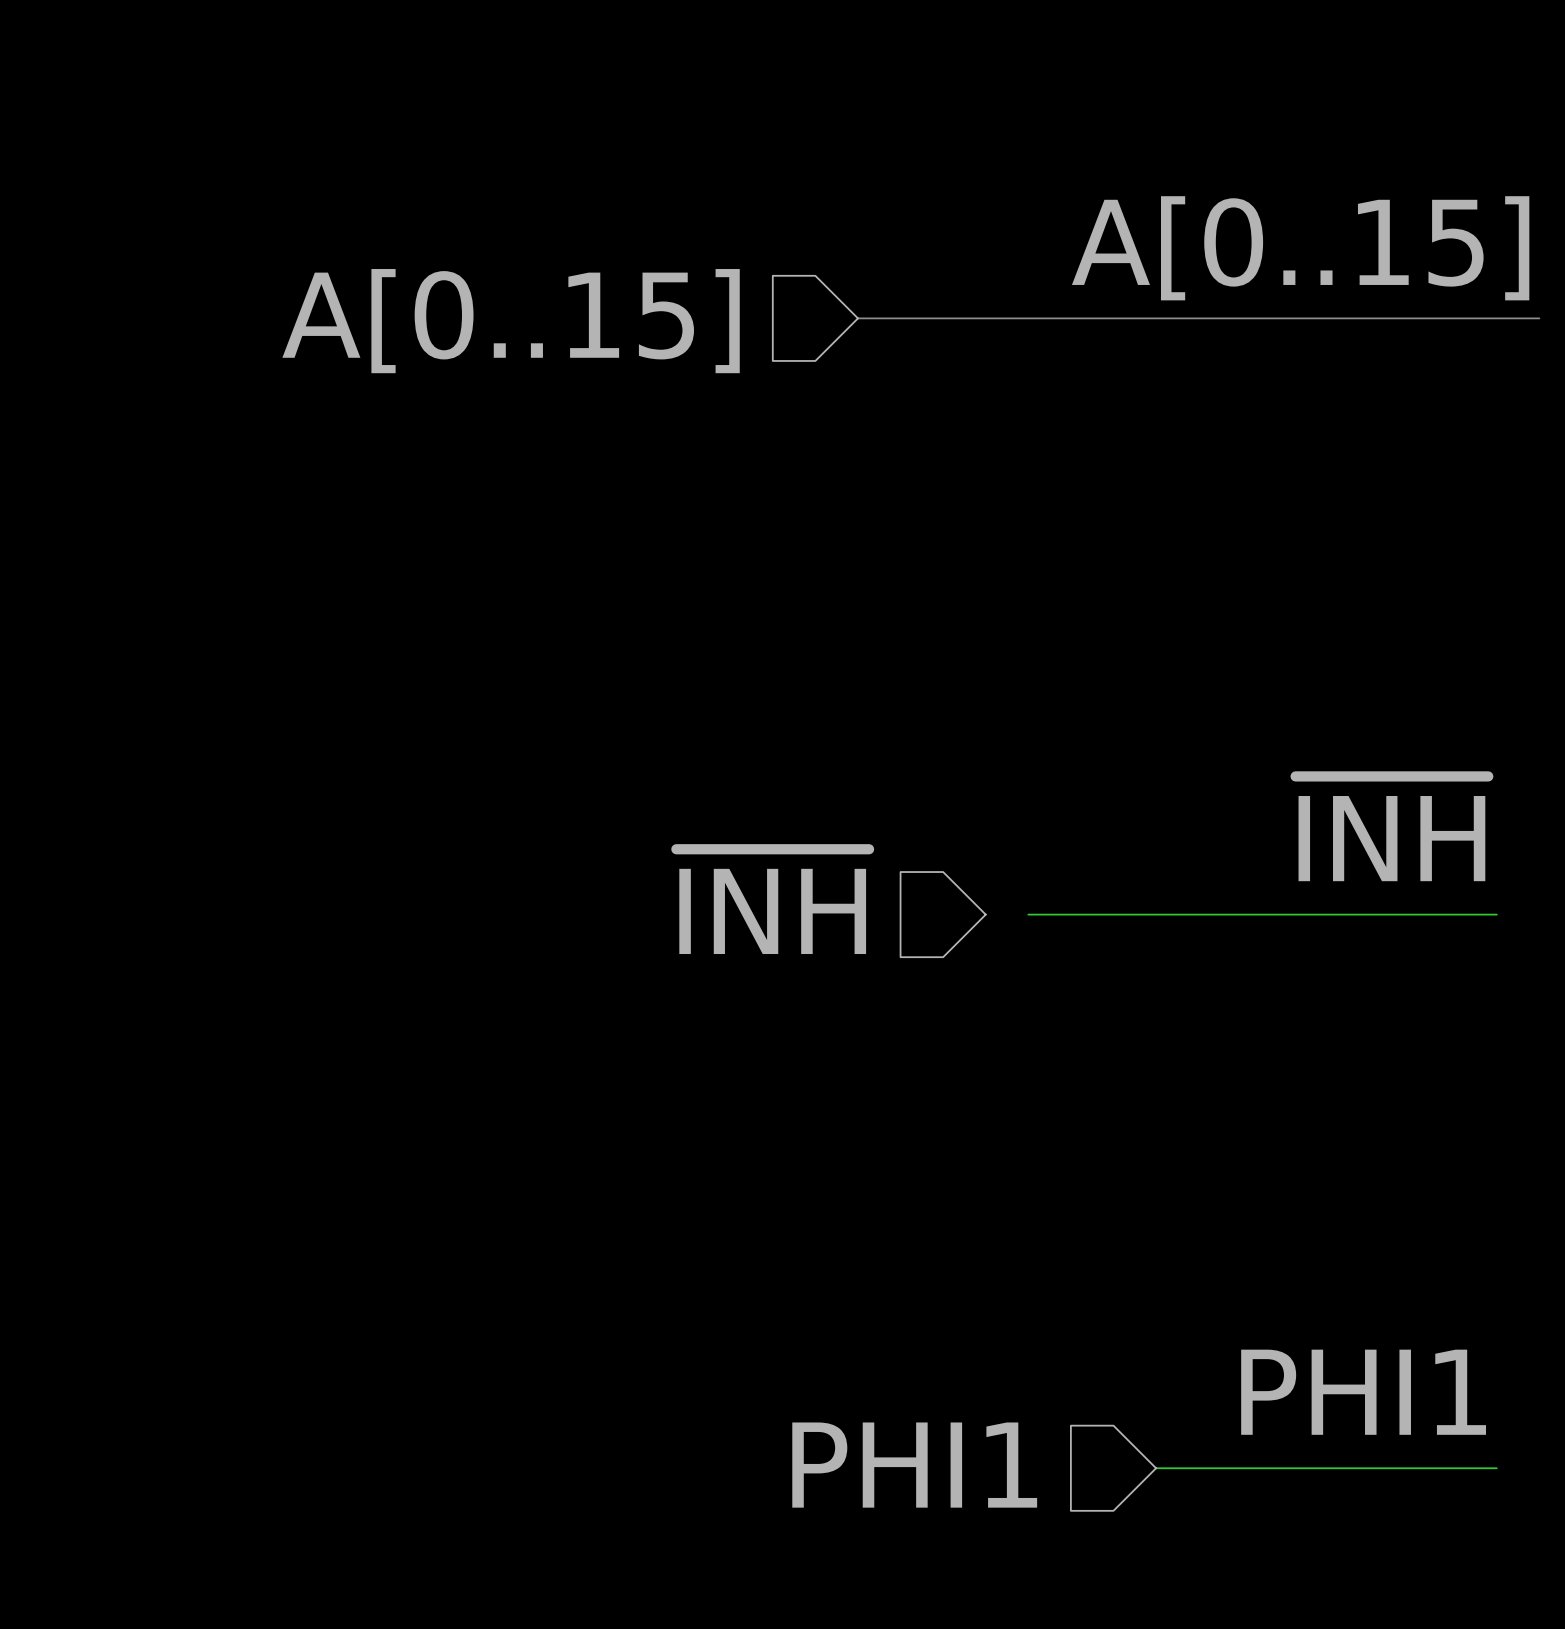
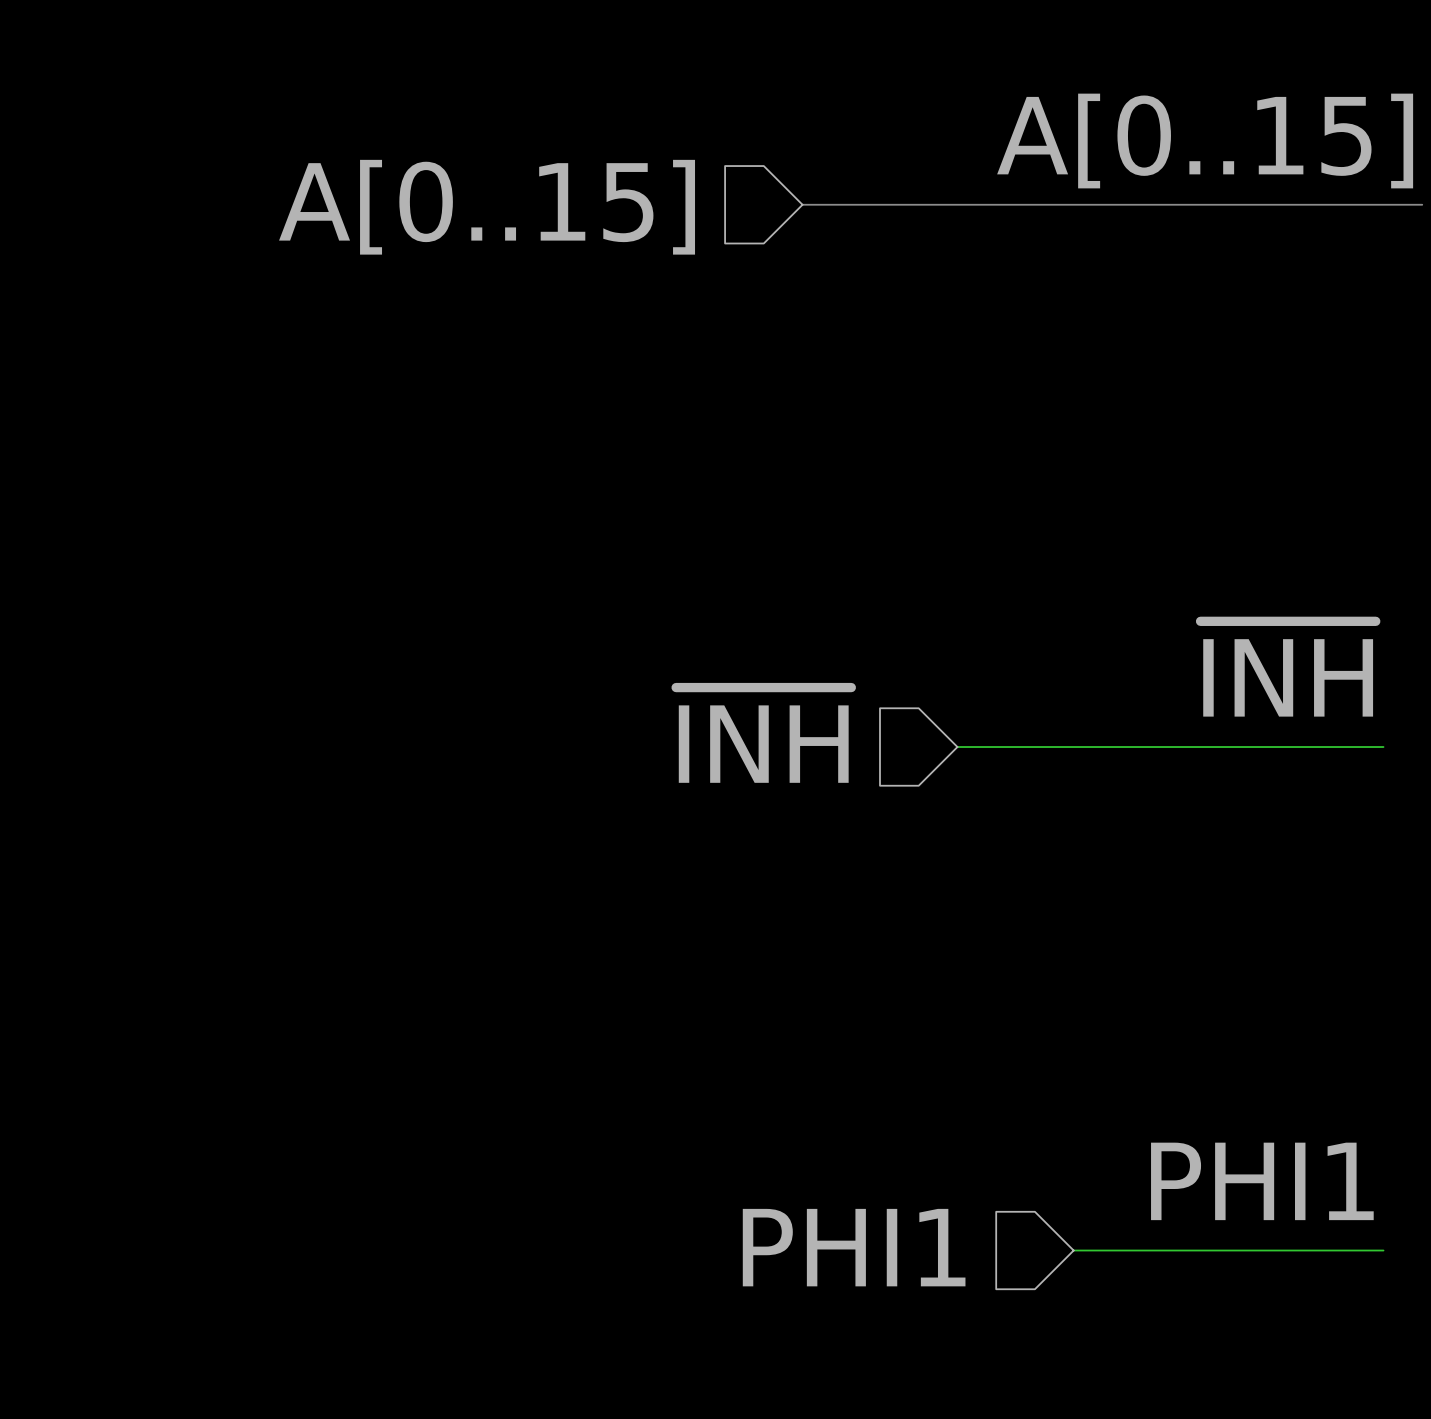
hierarchical label position: ~{INH} (772, 901) -> ~{INH} (763, 735)

